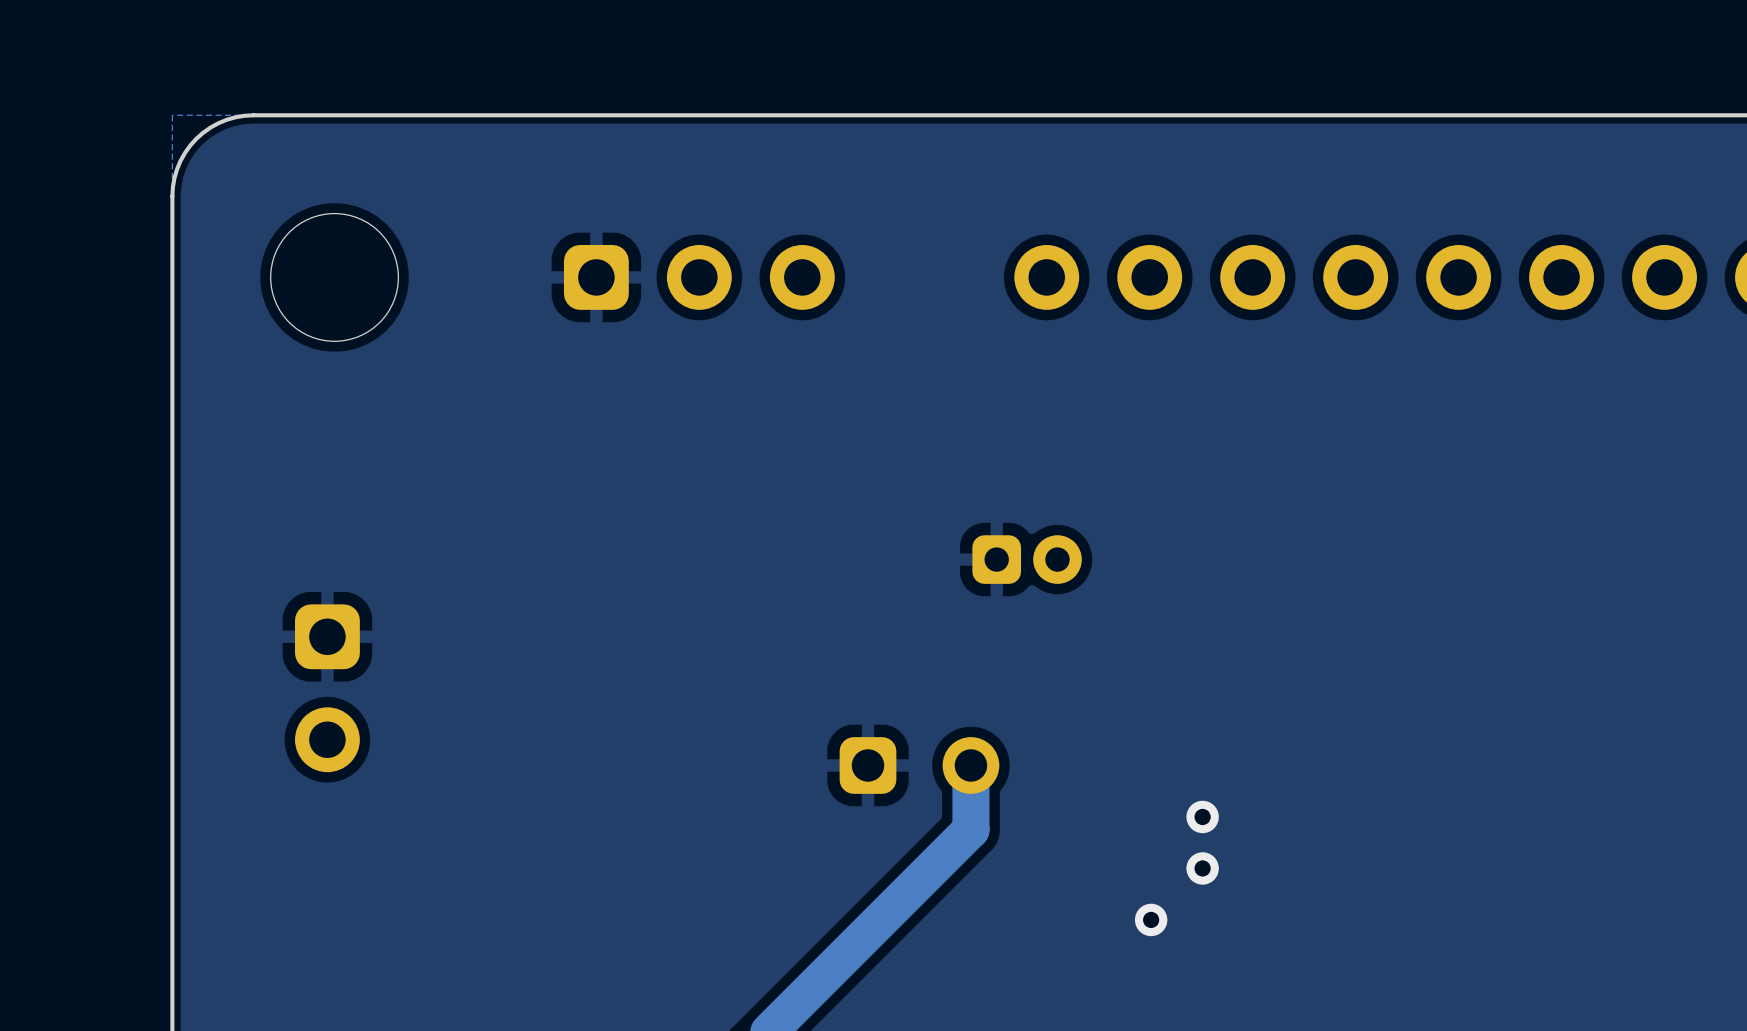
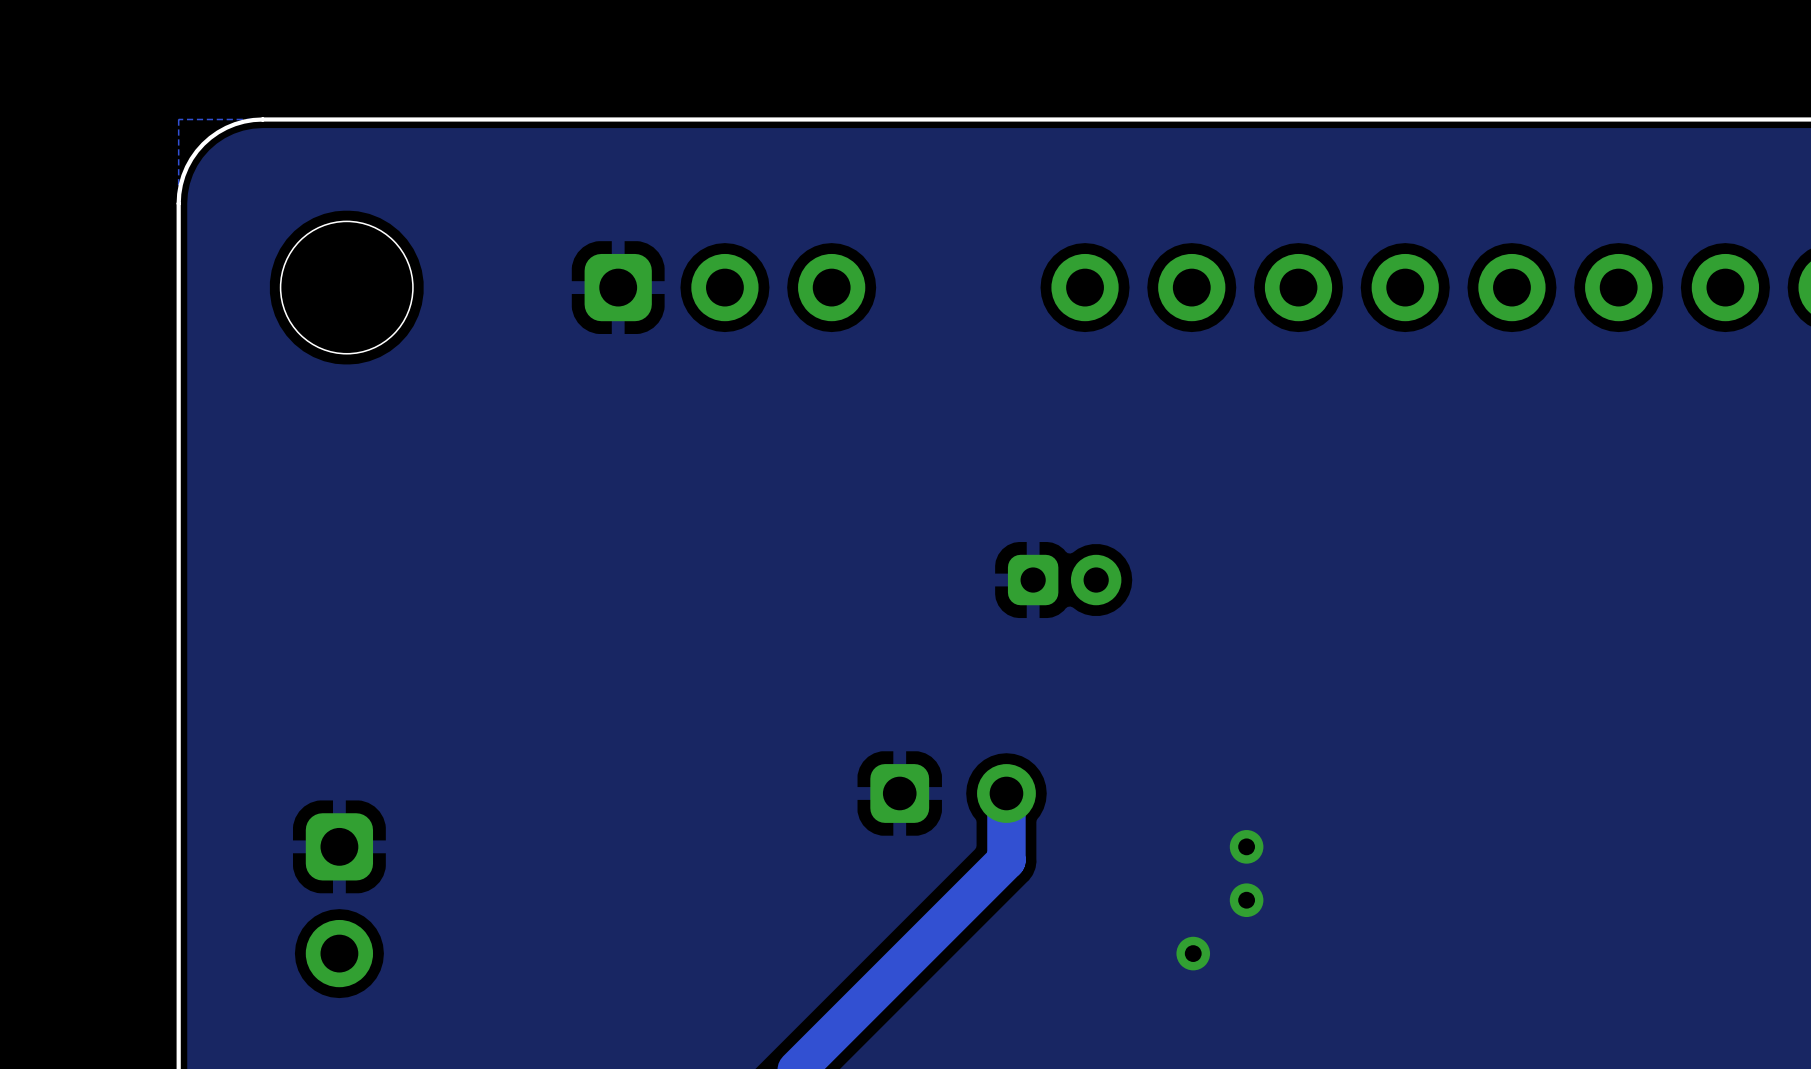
part position: (327, 688) -> (339, 900)

